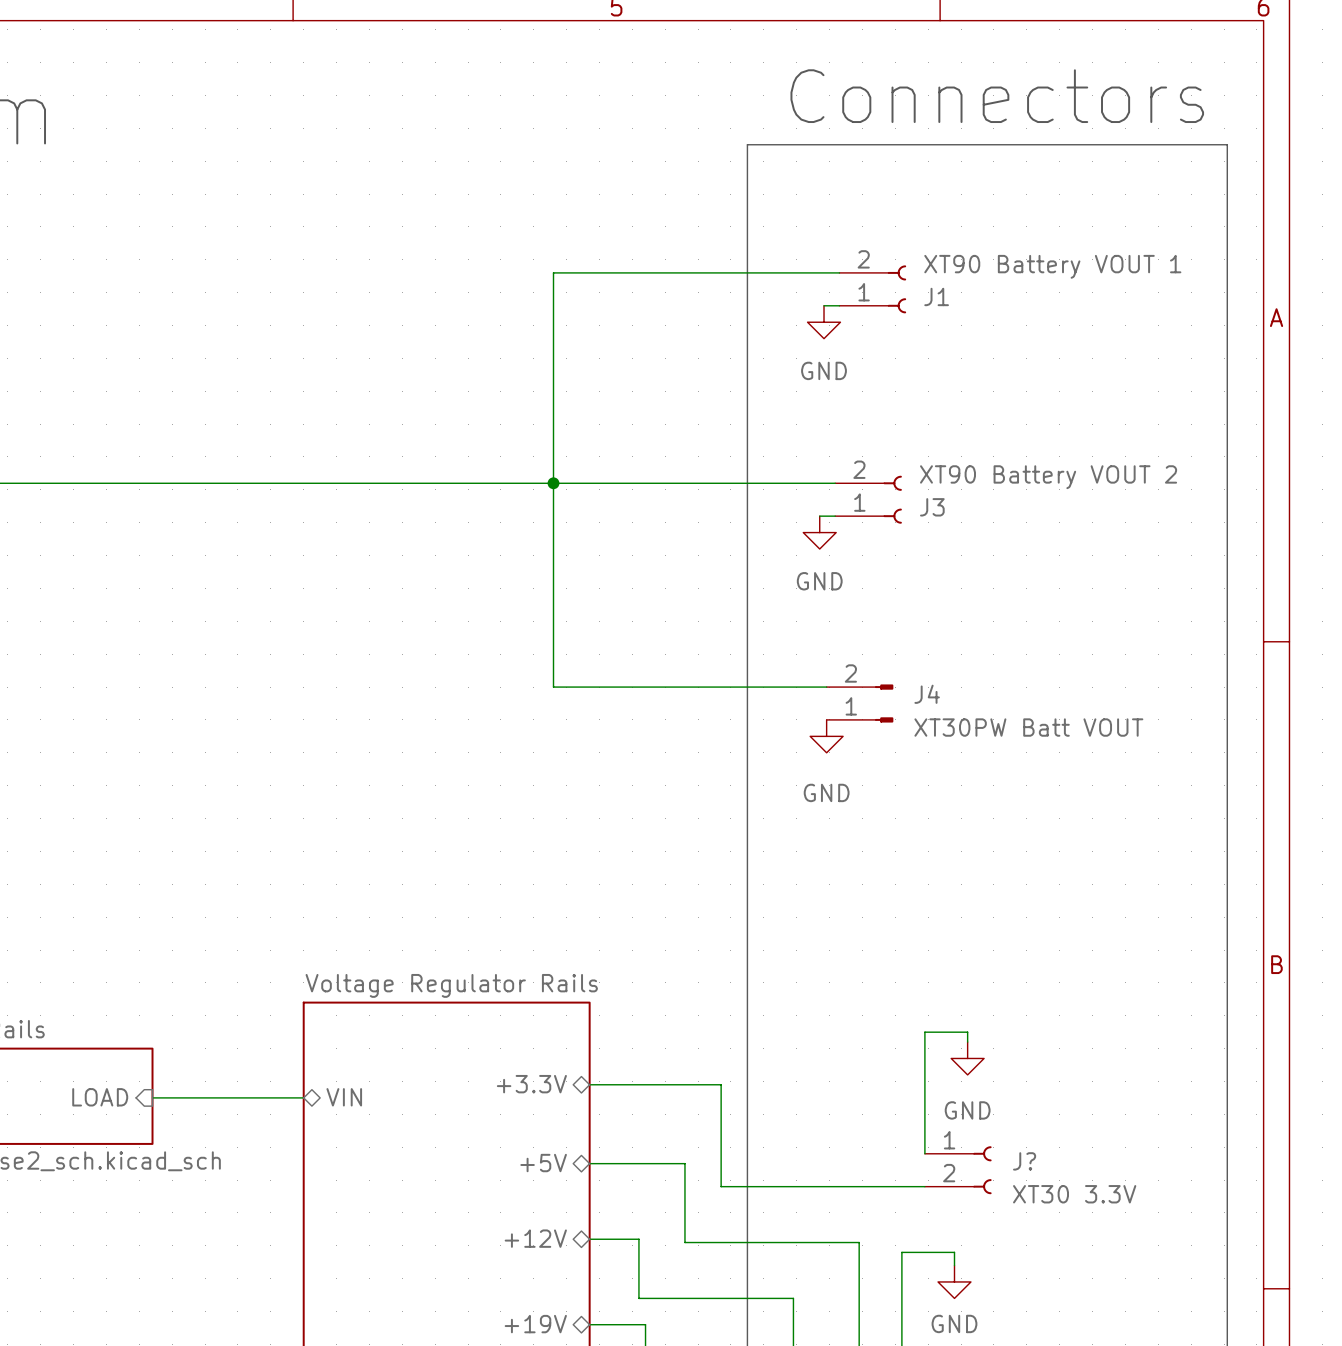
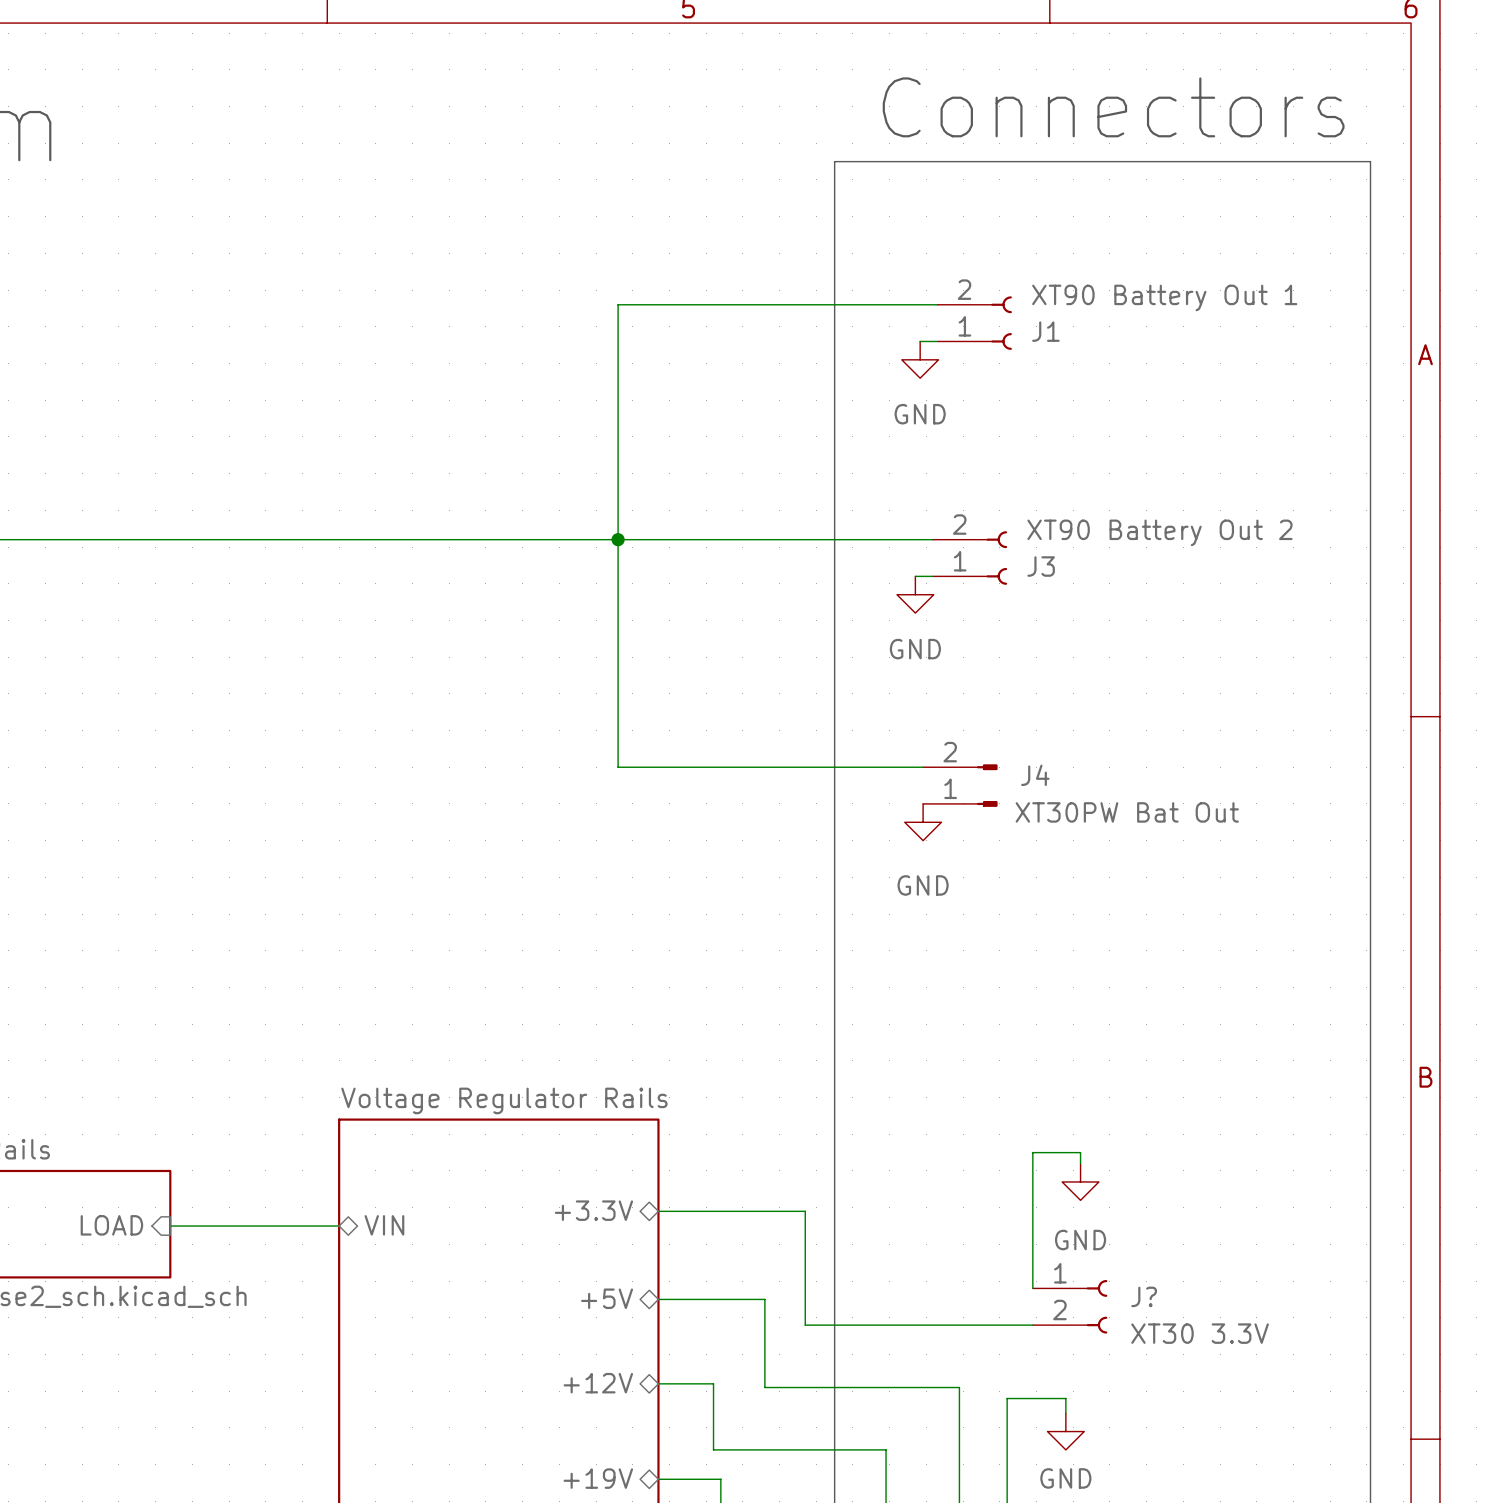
J1 value: XT90 Battery VOUT 1 (1052, 266) -> XT90 Battery Out 1 (1164, 297)
J3 value: XT90 Battery VOUT 2 (1048, 477) -> XT90 Battery Out 2 (1159, 532)
J4 value: XT30PW Batt VOUT (1028, 727) -> XT30PW Bat Out (1127, 812)

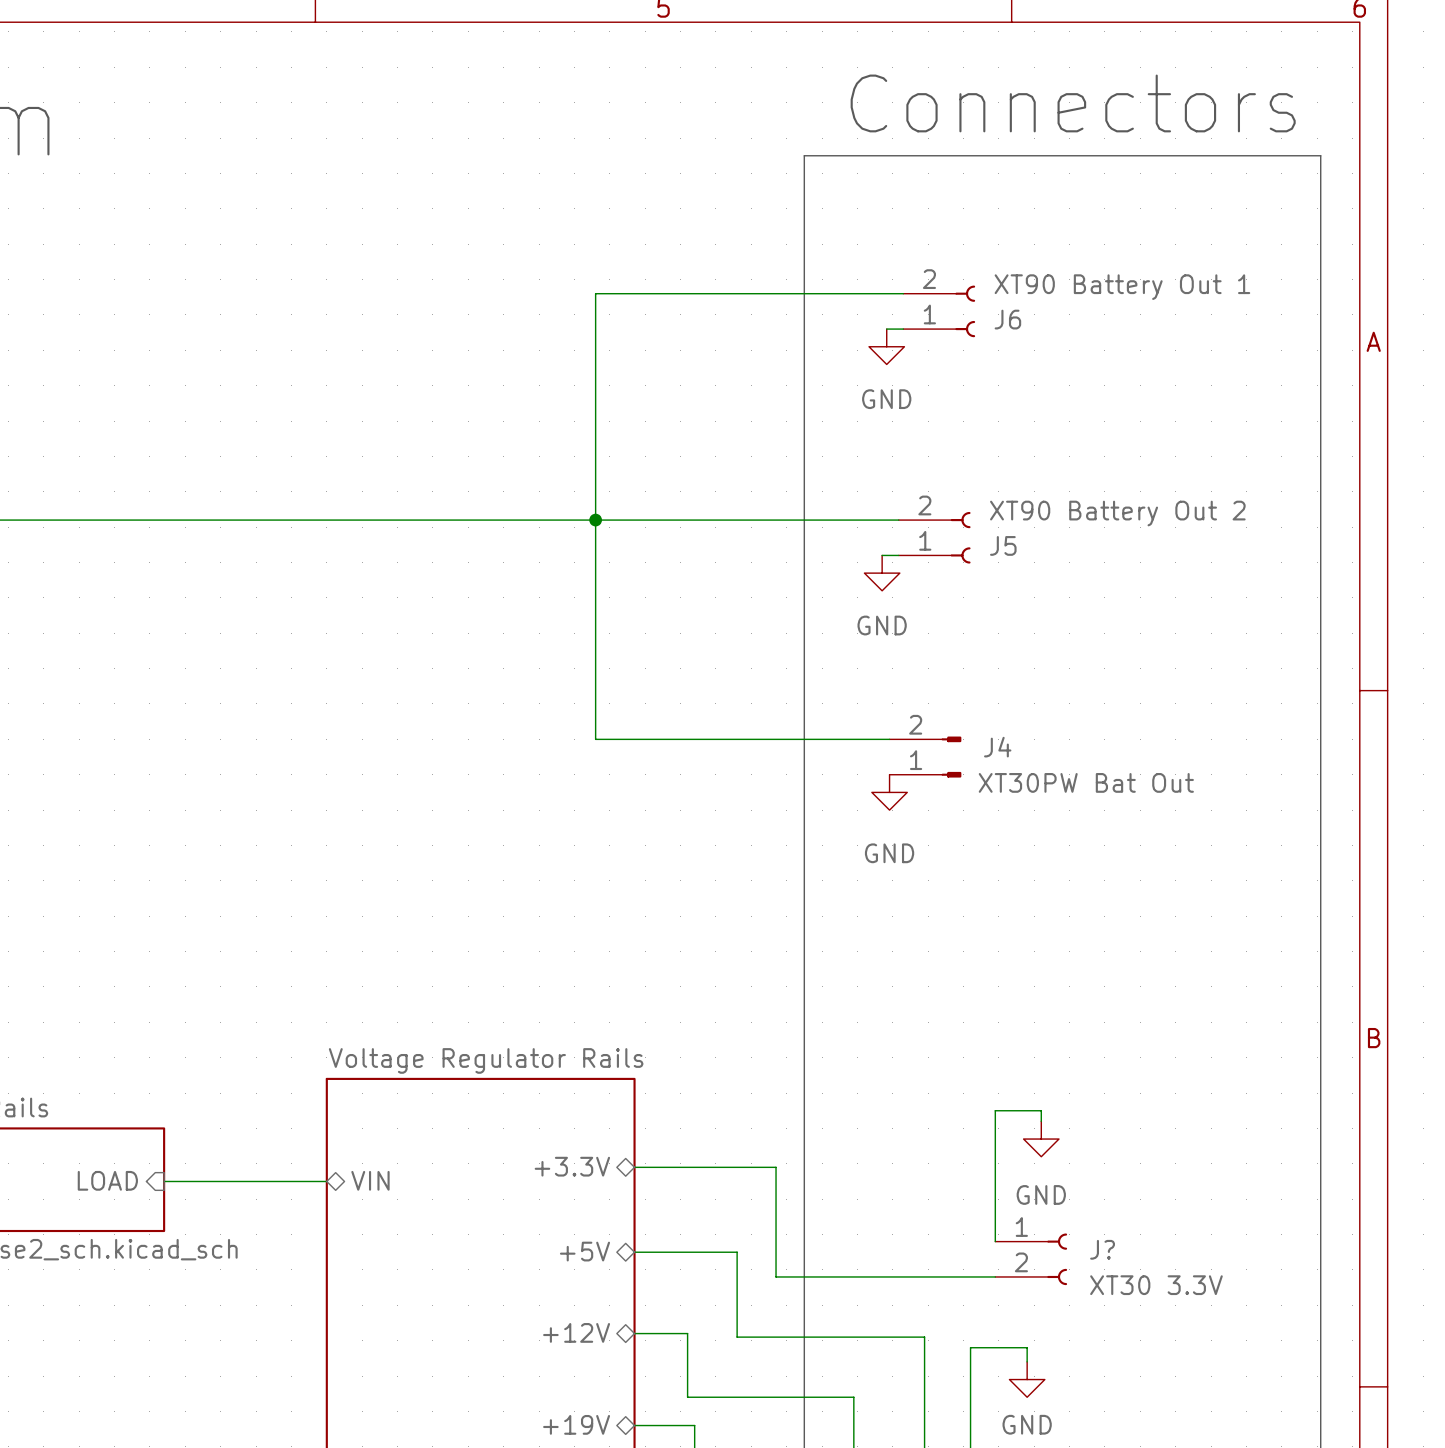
J1 name: J1 (1045, 331) -> J6 (1007, 319)
J3 name: J3 (1041, 566) -> J5 (1003, 545)

